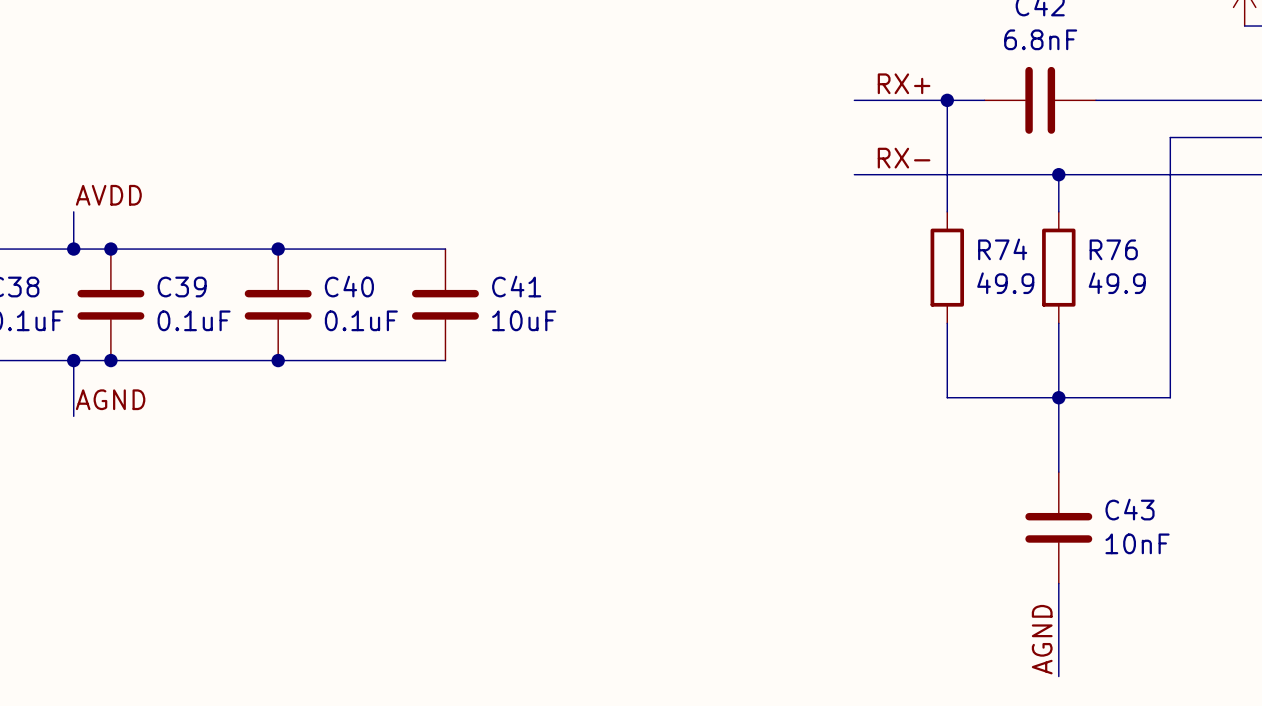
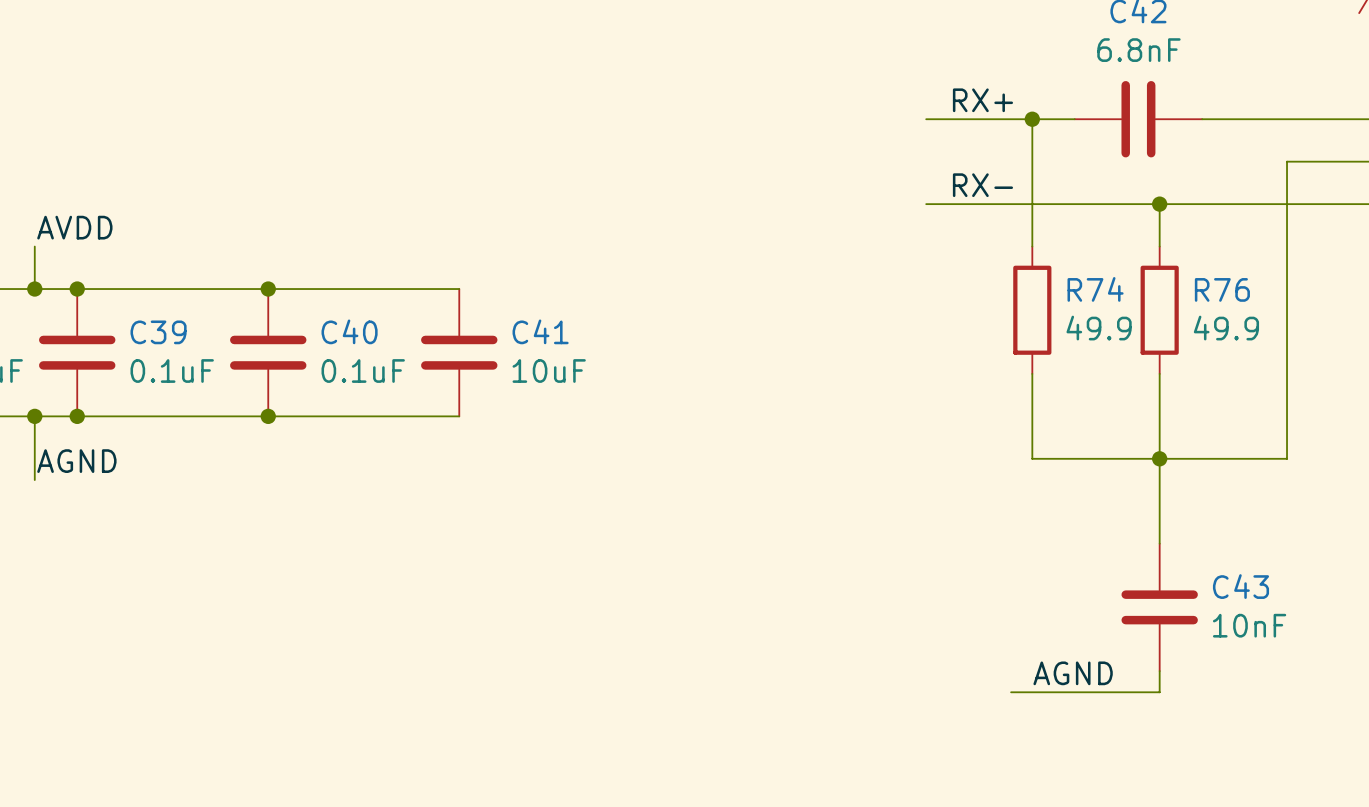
wire: (1058, 602) (1058, 676) -> (1159, 692) (1011, 692)
label rotation: 0° (1042, 639) -> 90° clockwise (1073, 673)

